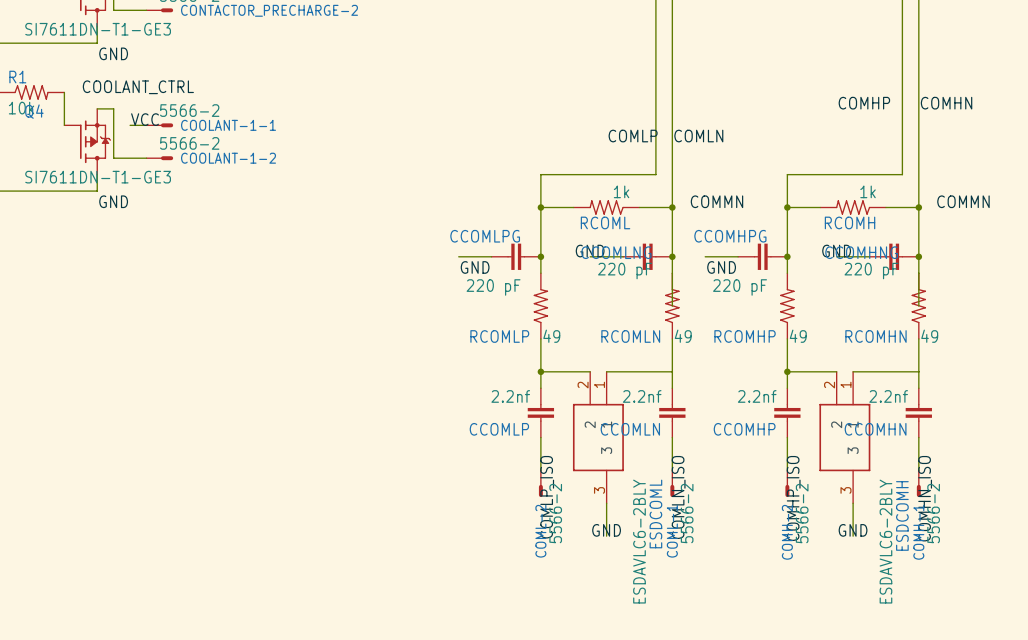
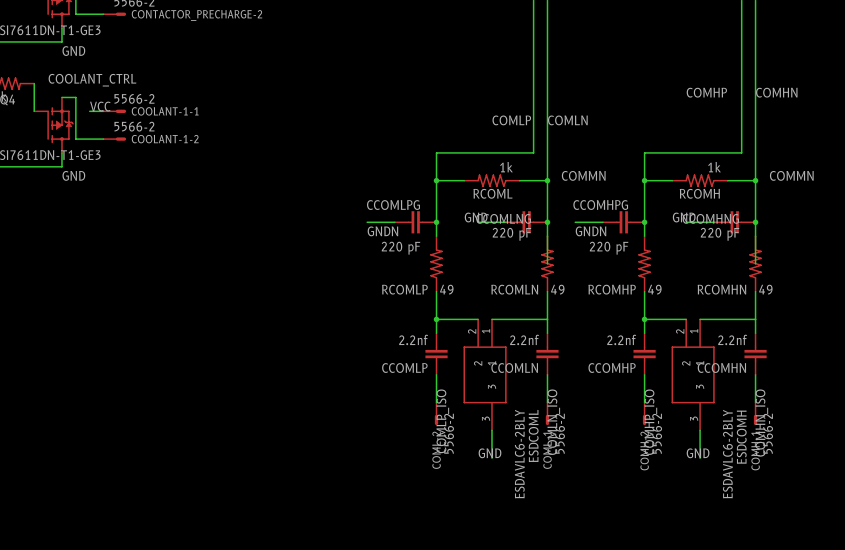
label: GND (475, 267) -> GNDN (382, 231)
label: GND (721, 267) -> GNDN (590, 231)

